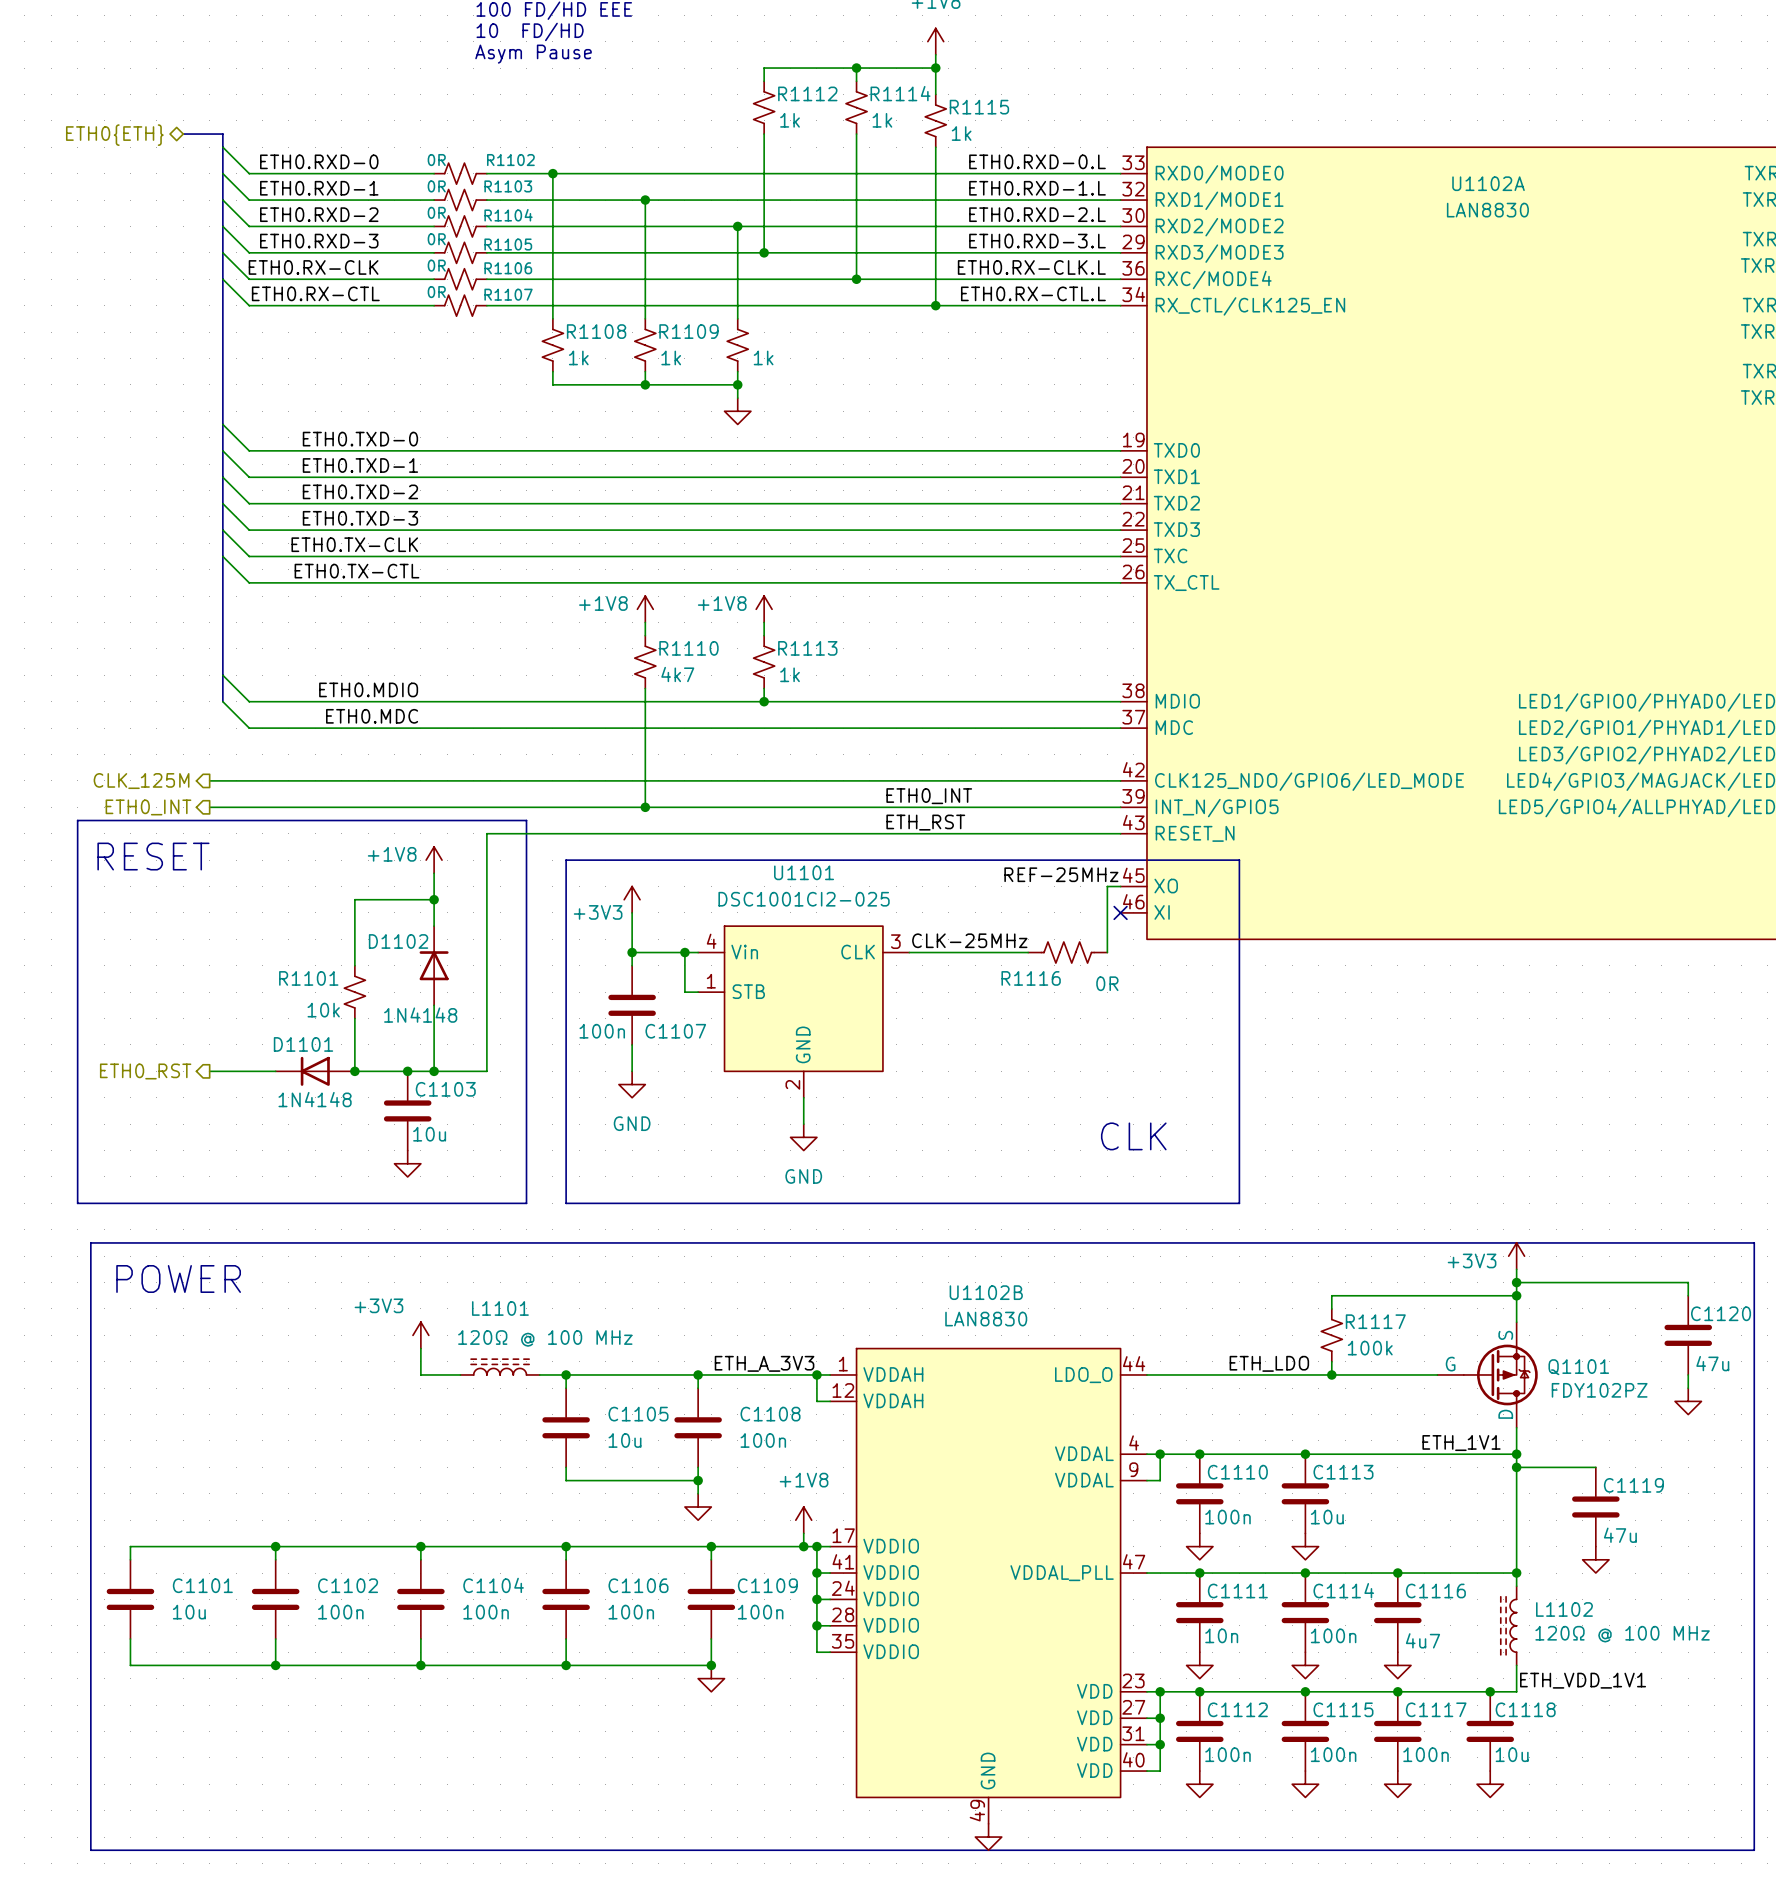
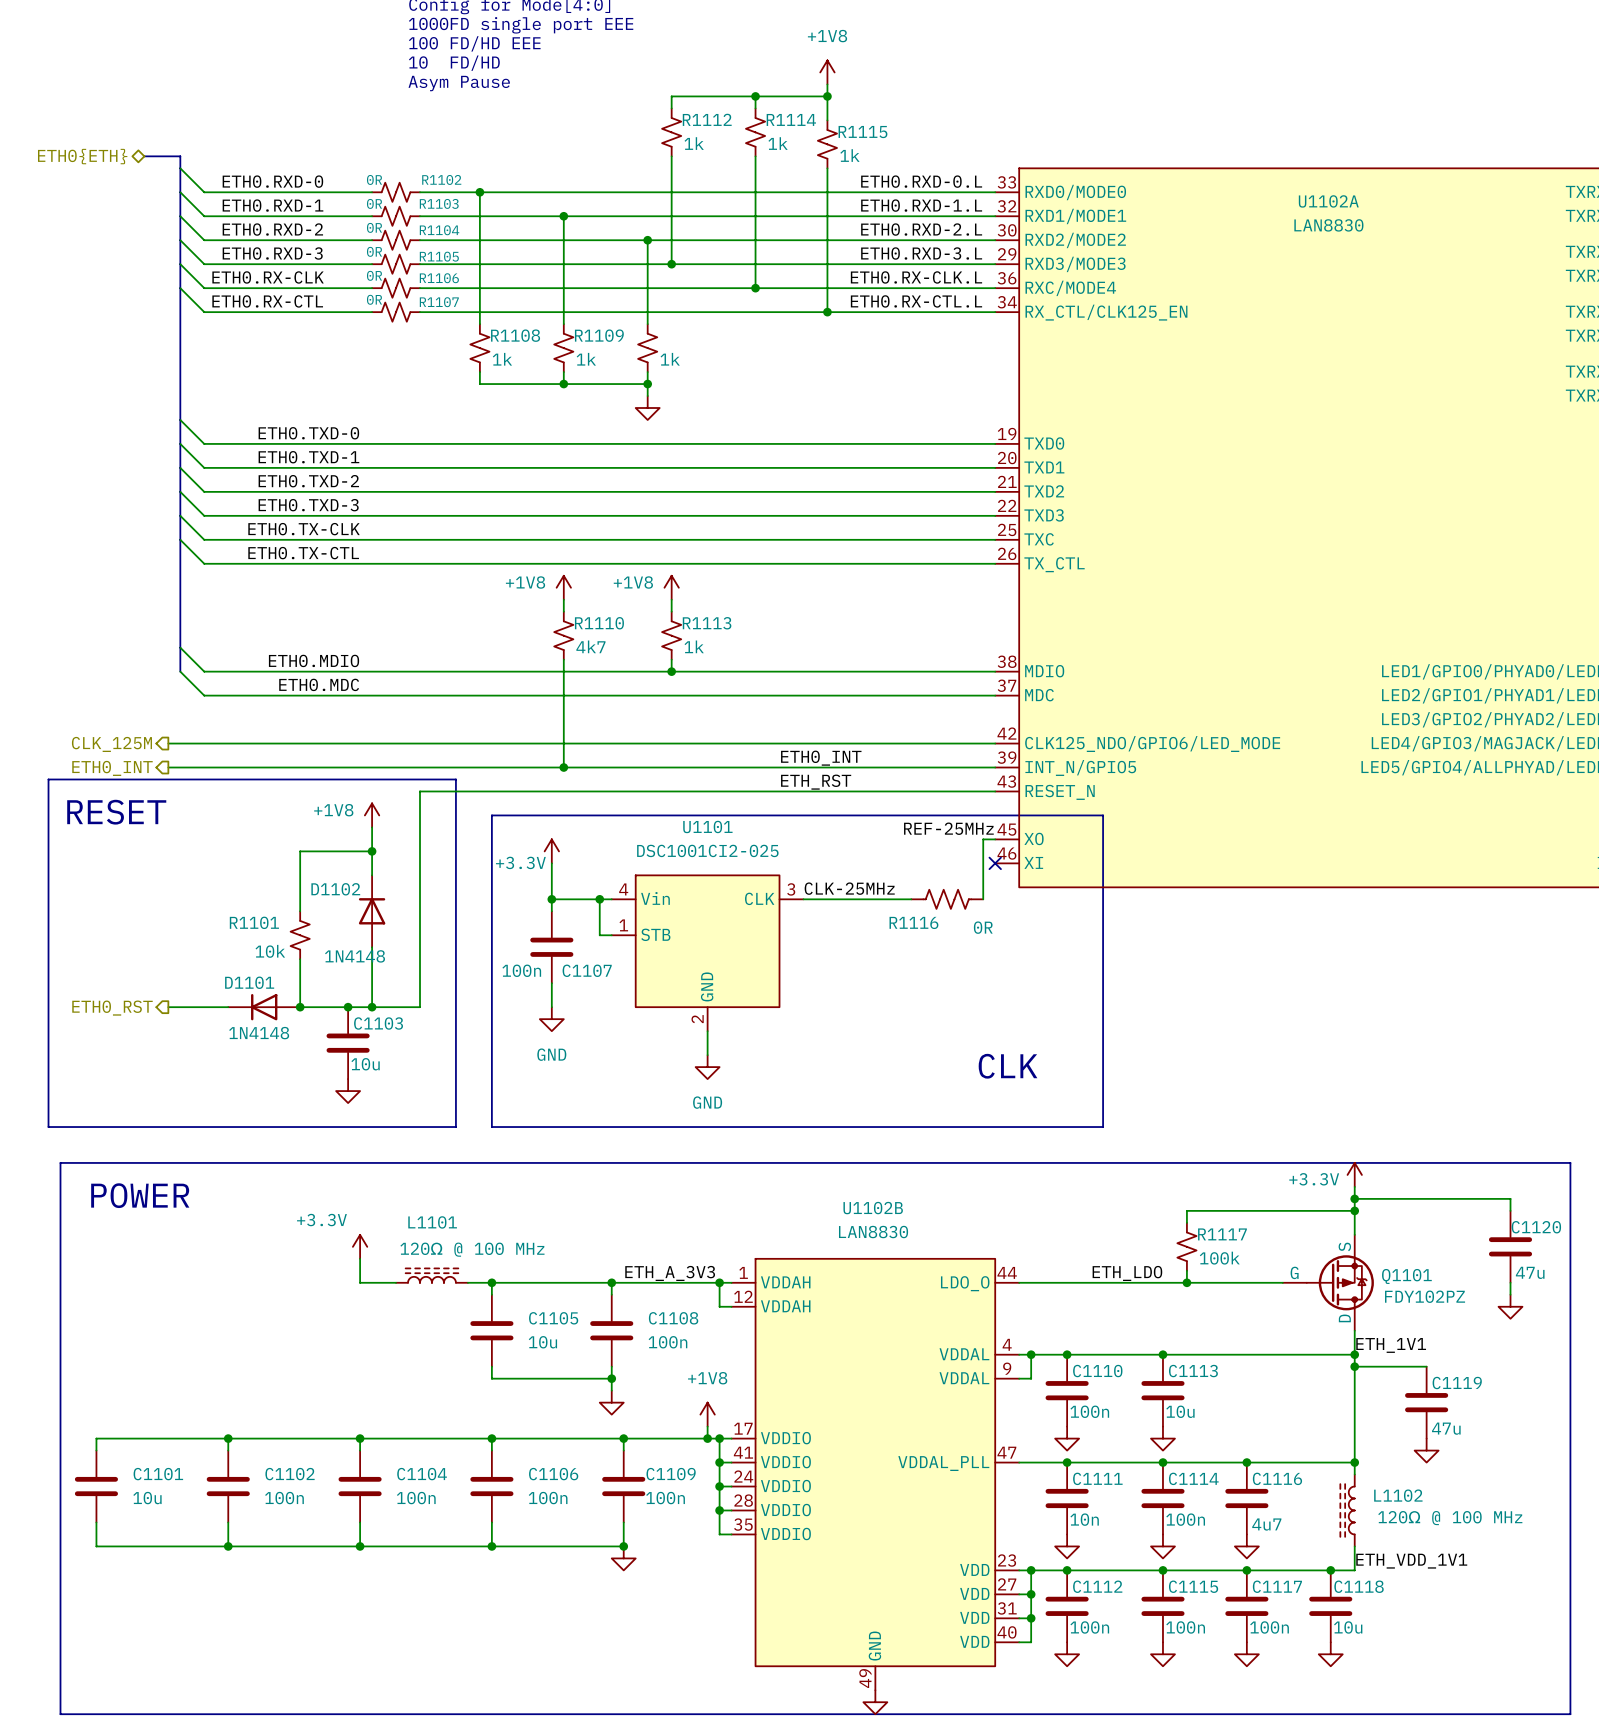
power symbol: +3V3 (632, 899) -> +3.3V (551, 851)
power symbol: +3V3 (1516, 1256) -> +3.3V (1354, 1174)
power symbol: +3V3 (420, 1335) -> +3.3V (360, 1246)
label position: ETH_1V1 (1461, 1443) -> ETH_1V1 (1391, 1345)

